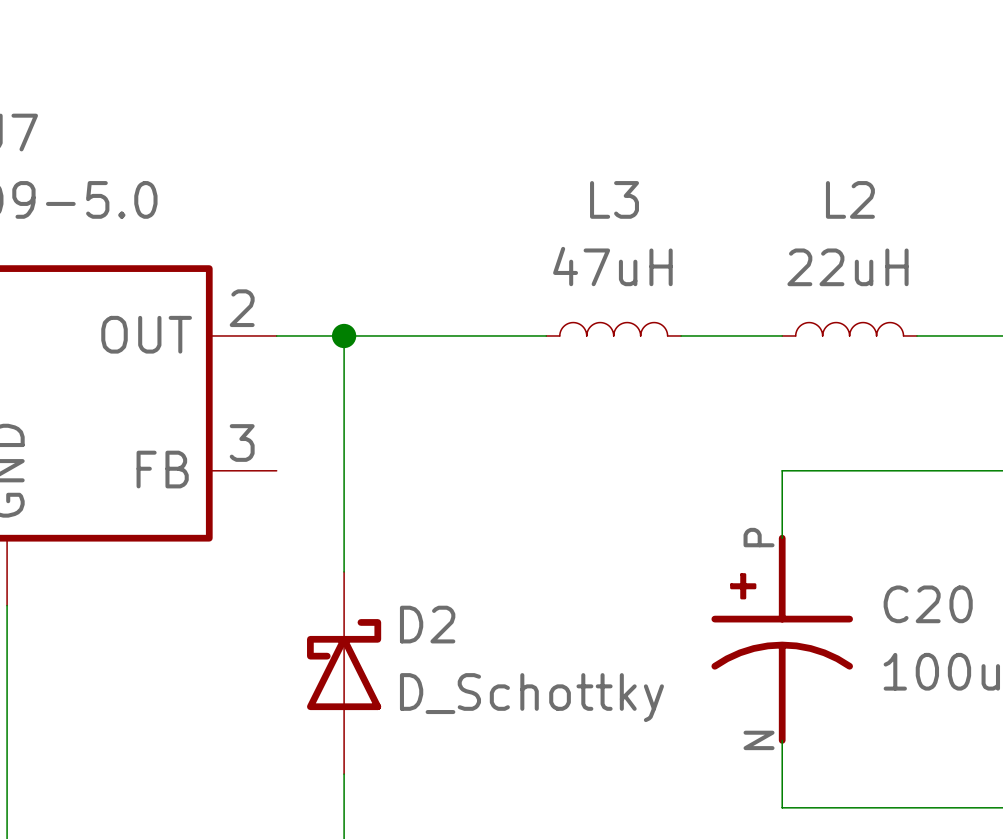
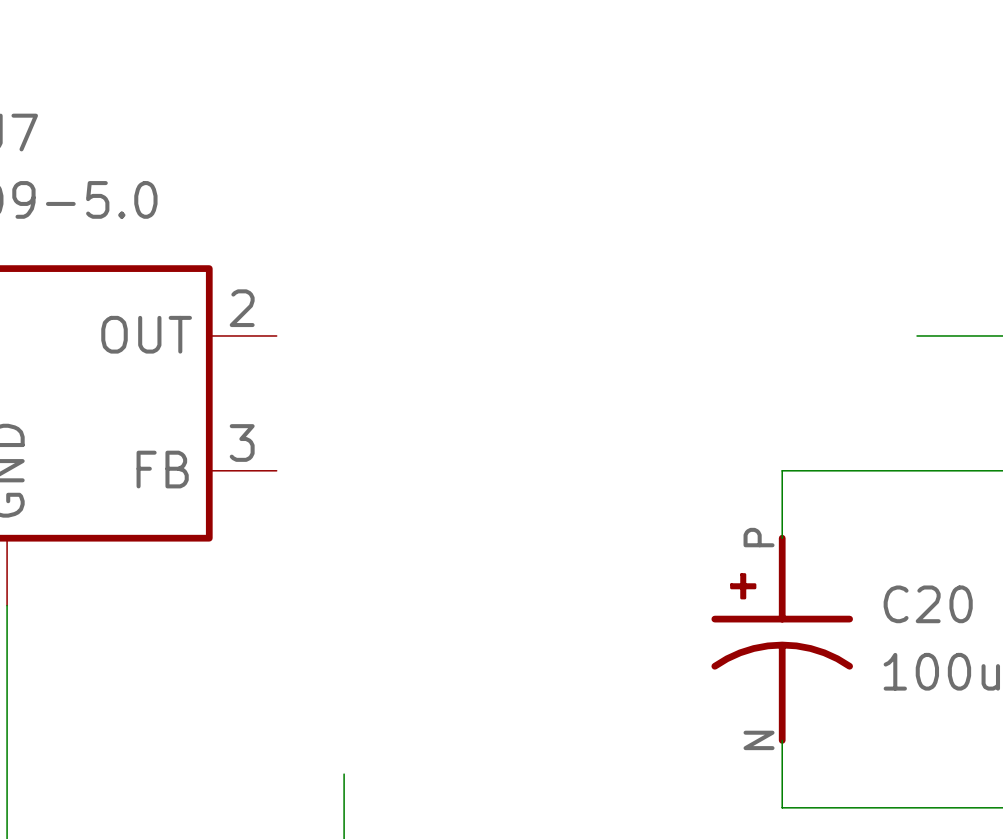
L3: 47uH (613, 329) -> none
L2: 22uH (849, 329) -> none
wire: (276, 335) (546, 335) -> none
wire: (344, 335) (344, 571) -> none
junction: (344, 335) -> none
wire: (681, 335) (782, 335) -> none
D2: D_Schottky (344, 673) -> none

